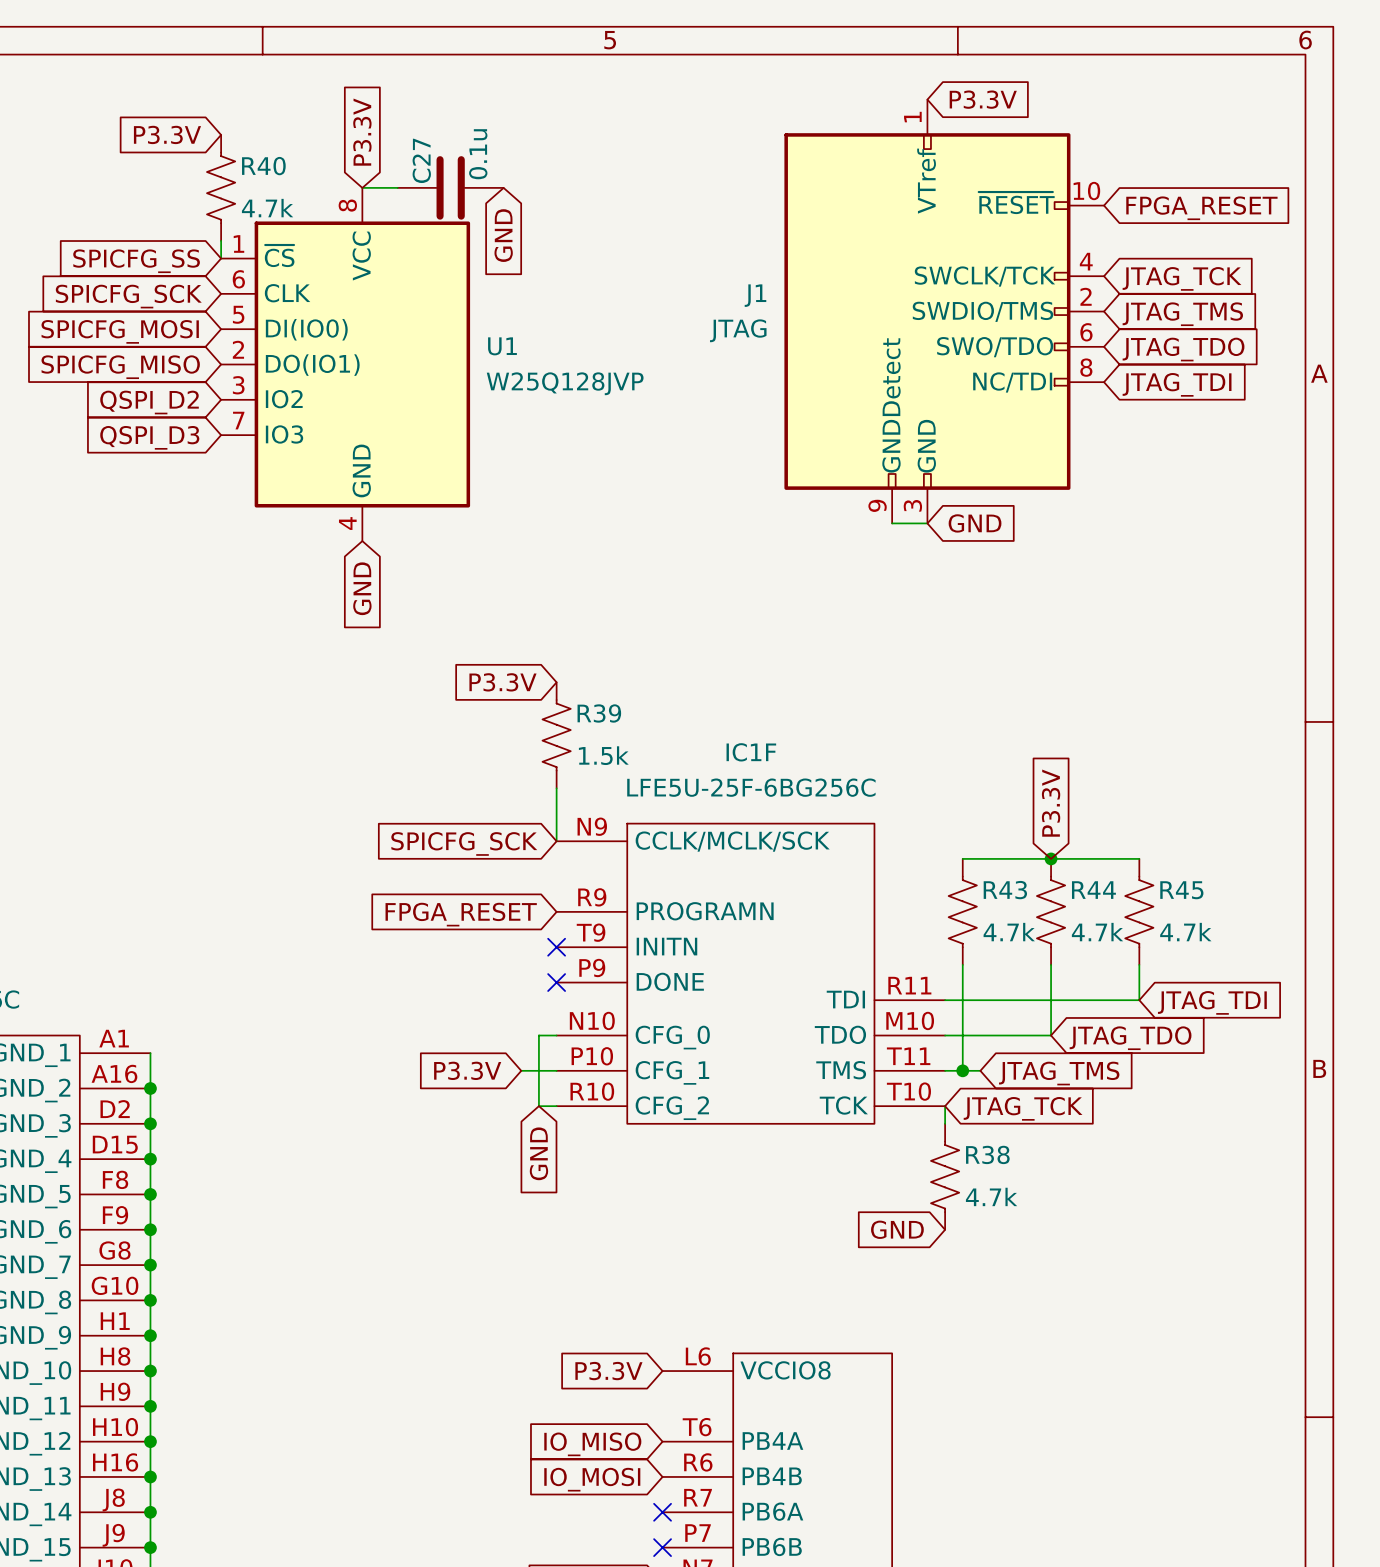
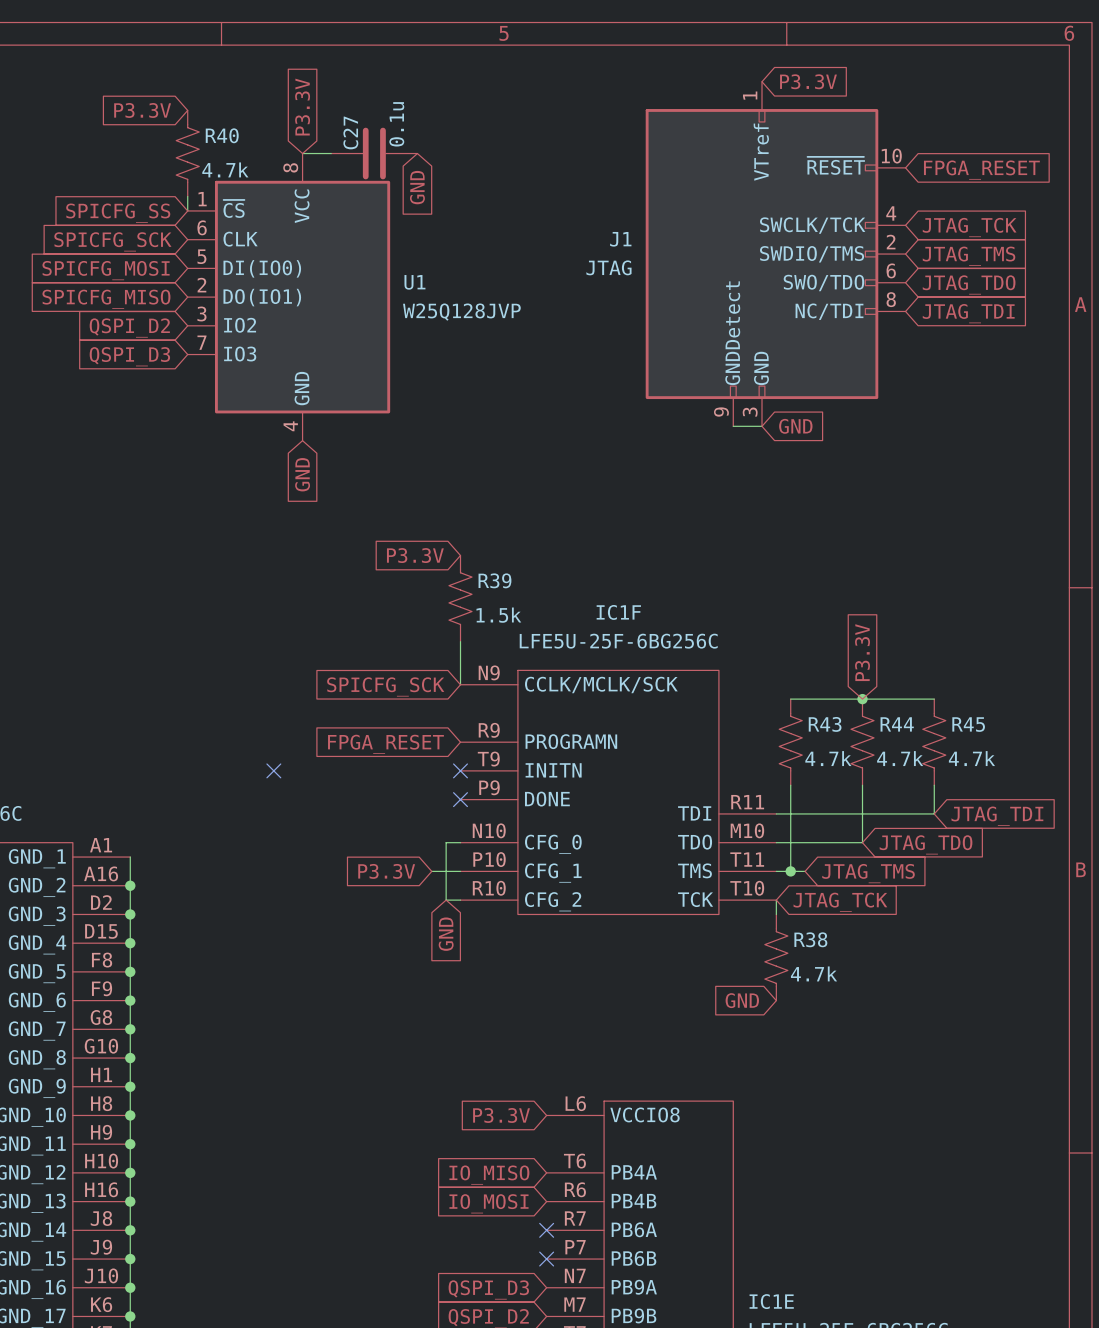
no-connect mark: none -> (273, 770)

